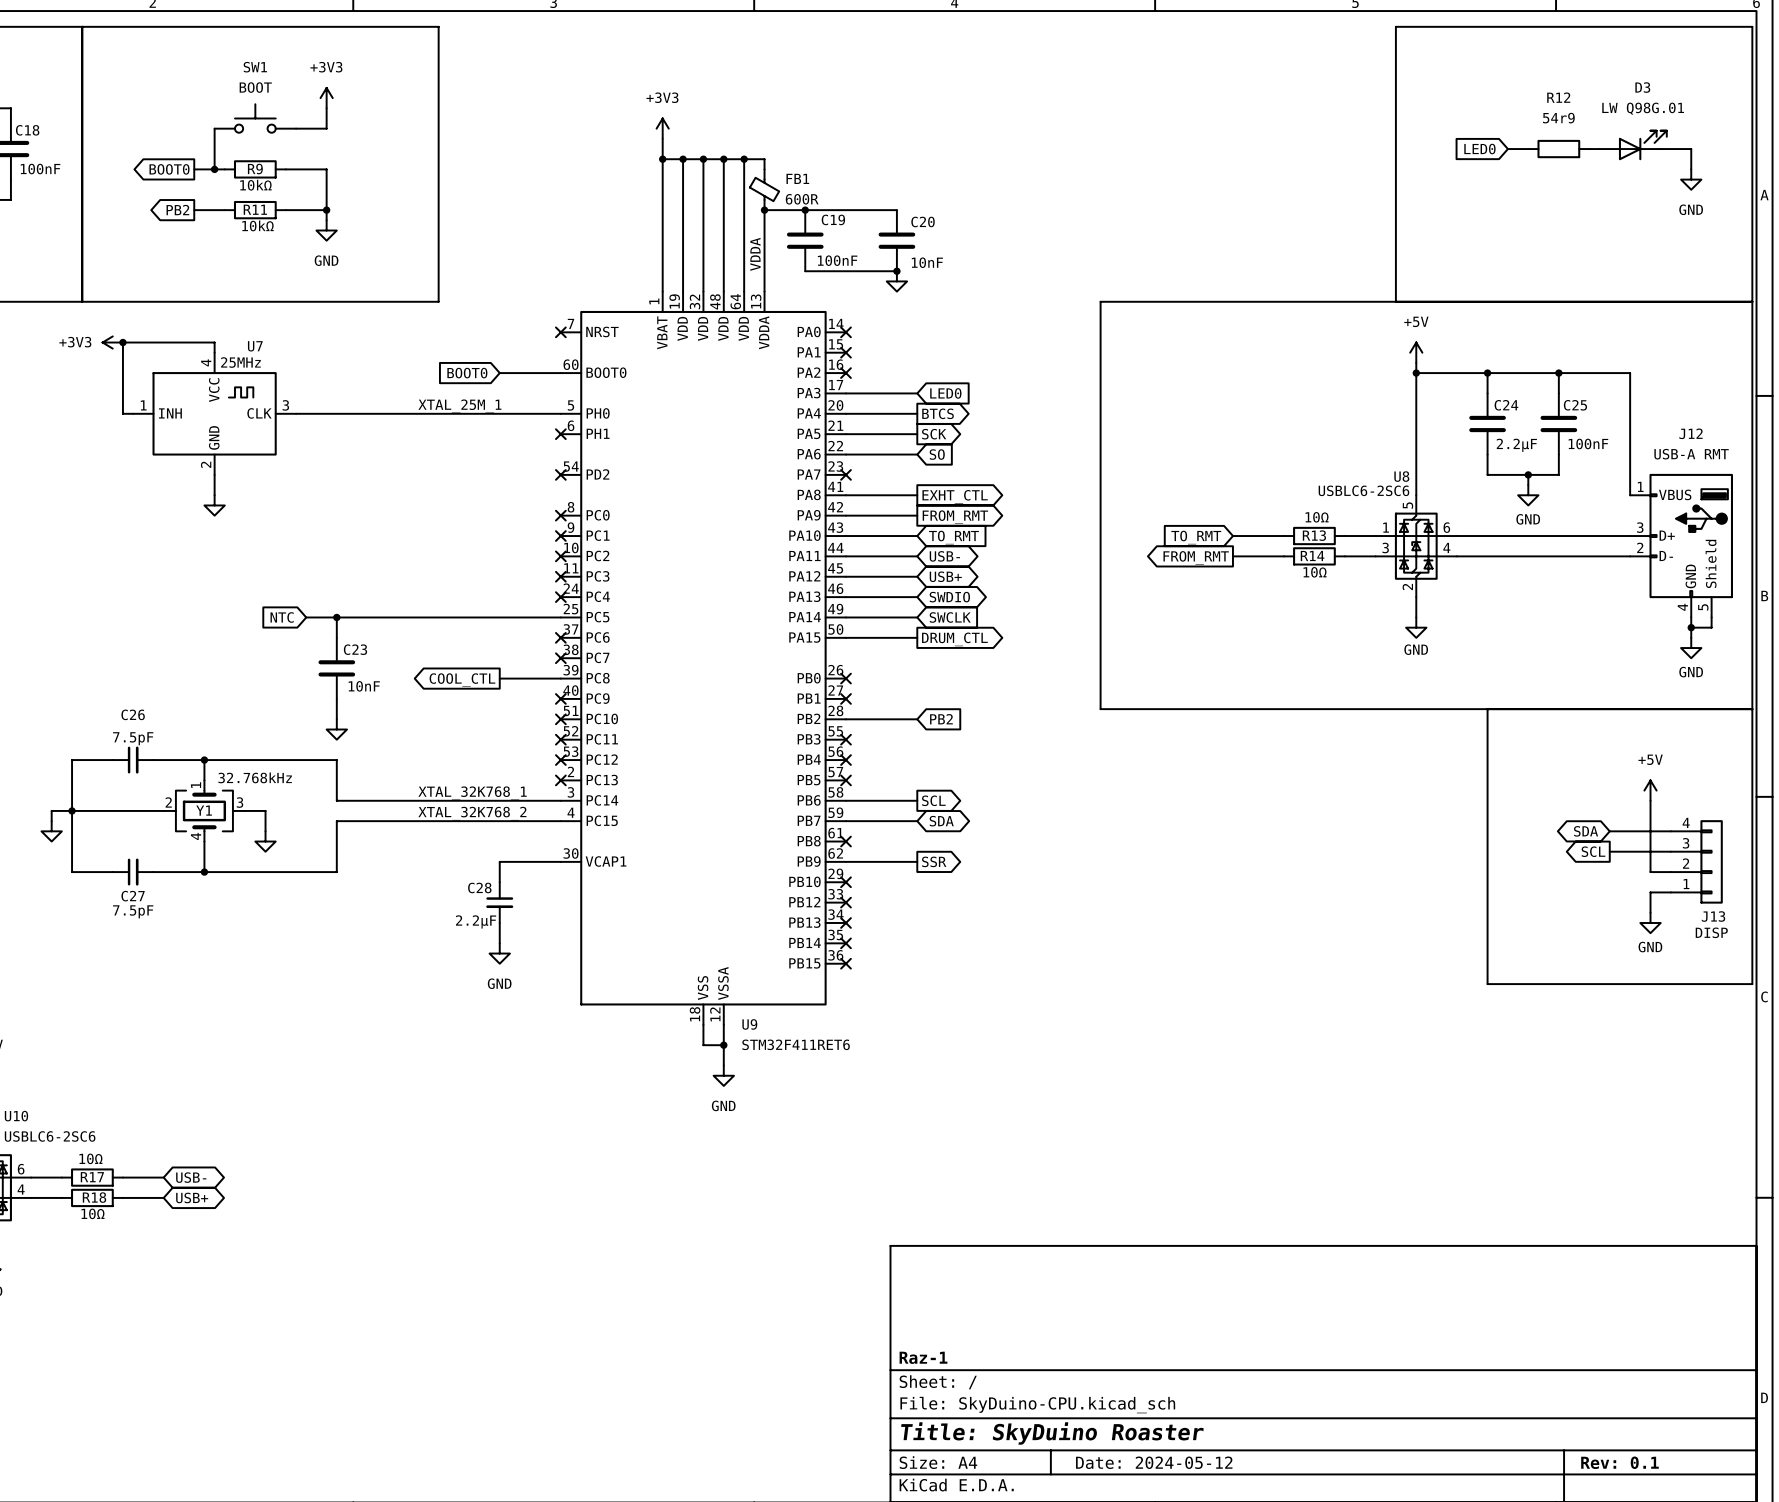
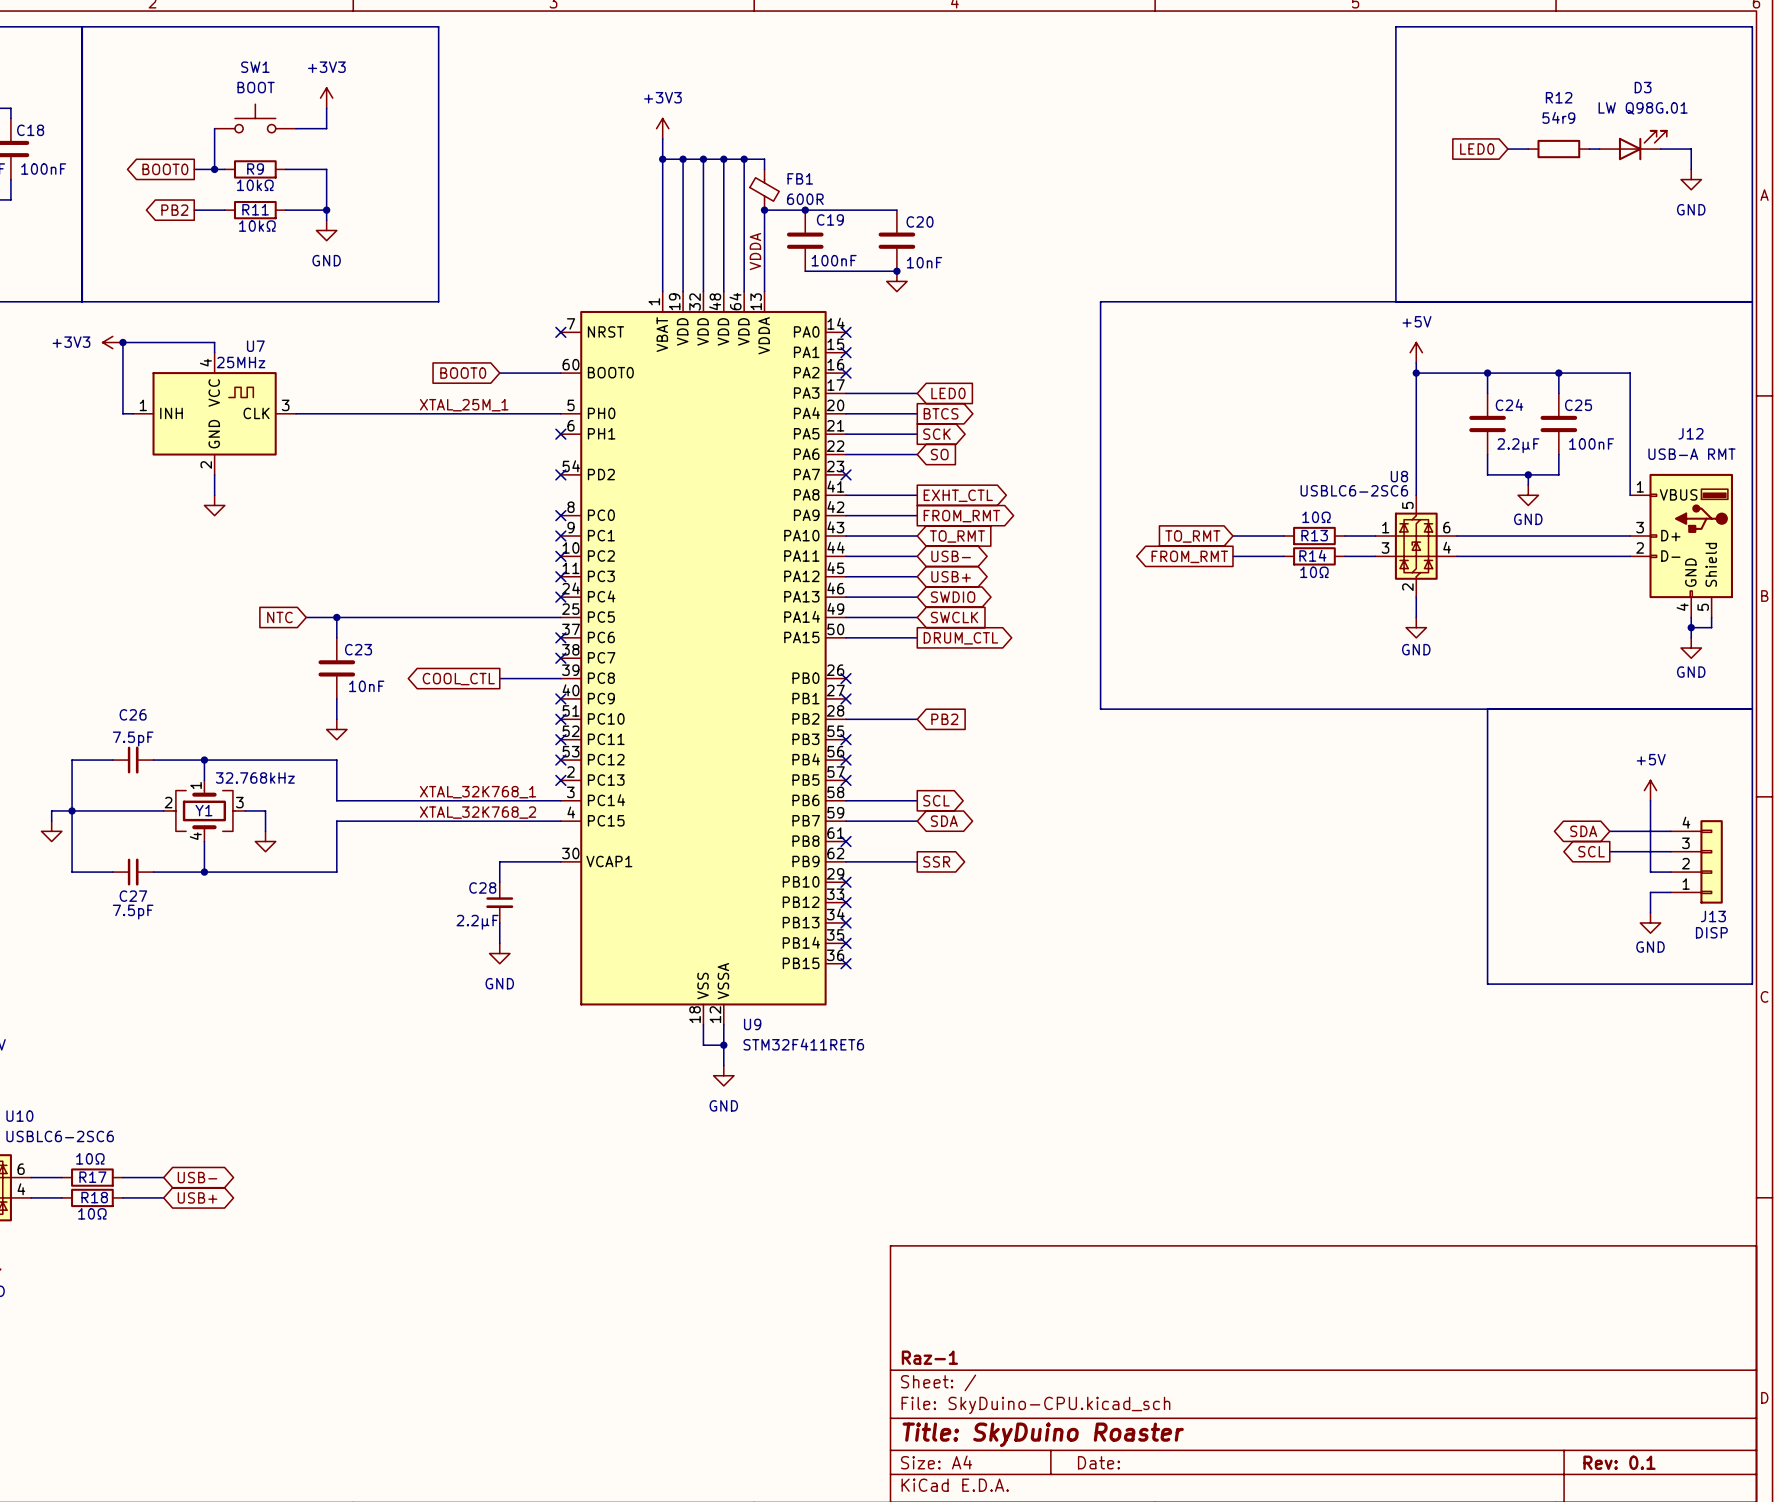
title block: Date: 2024-05-12 (1154, 1462) -> Date: (1098, 1462)

